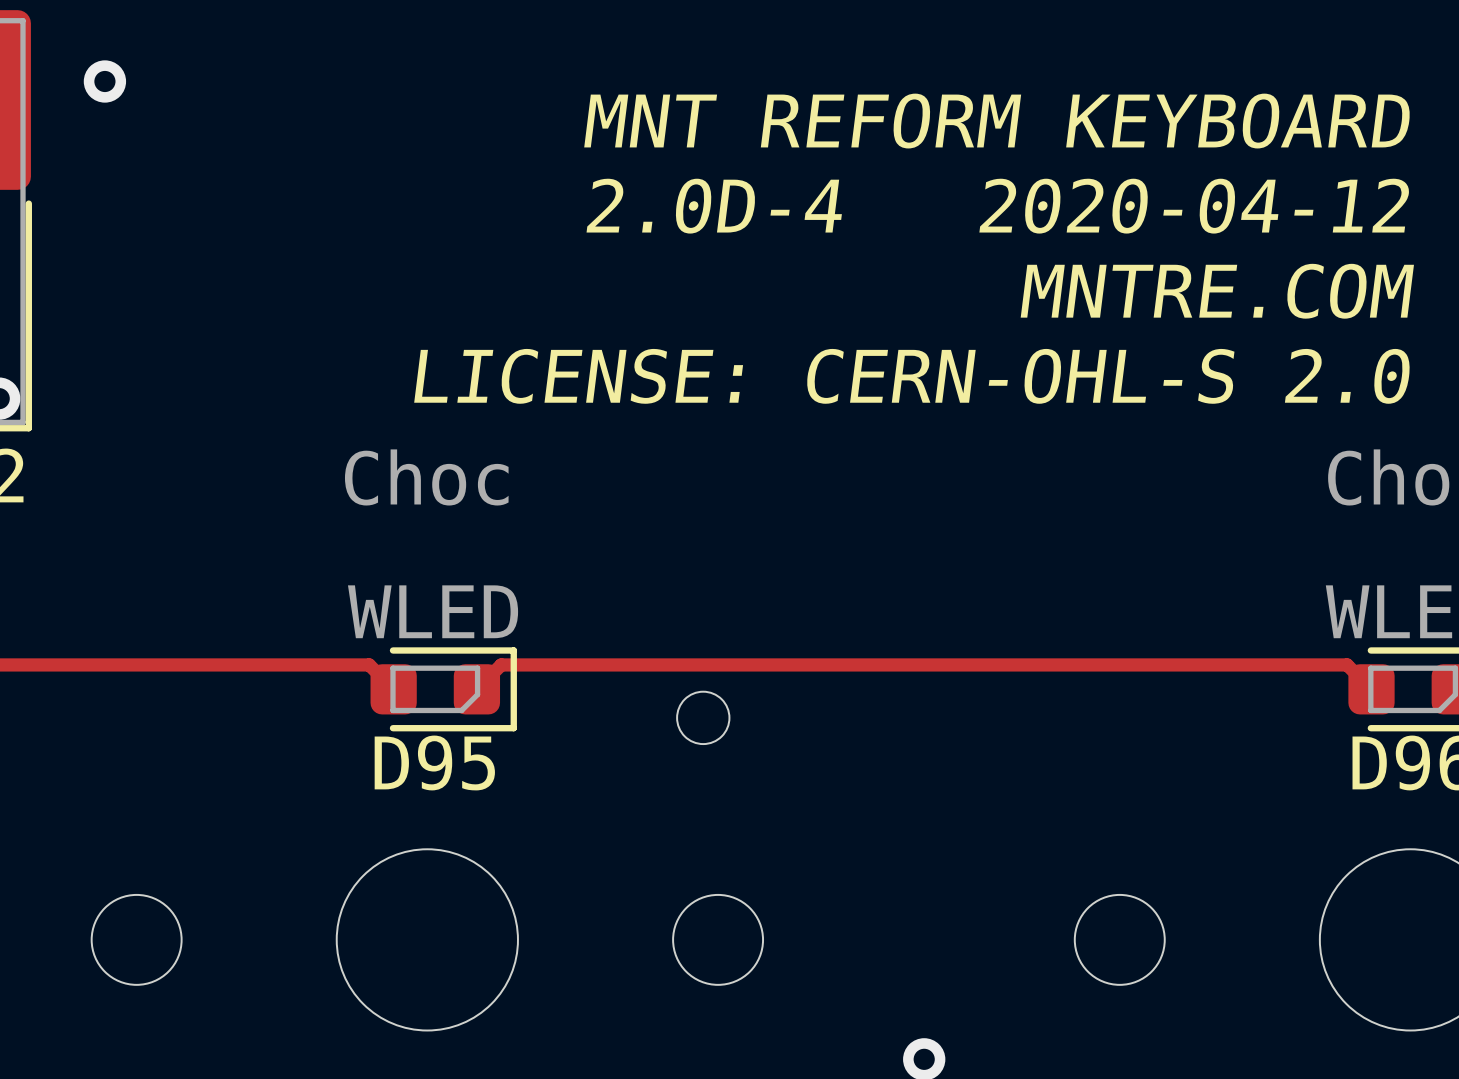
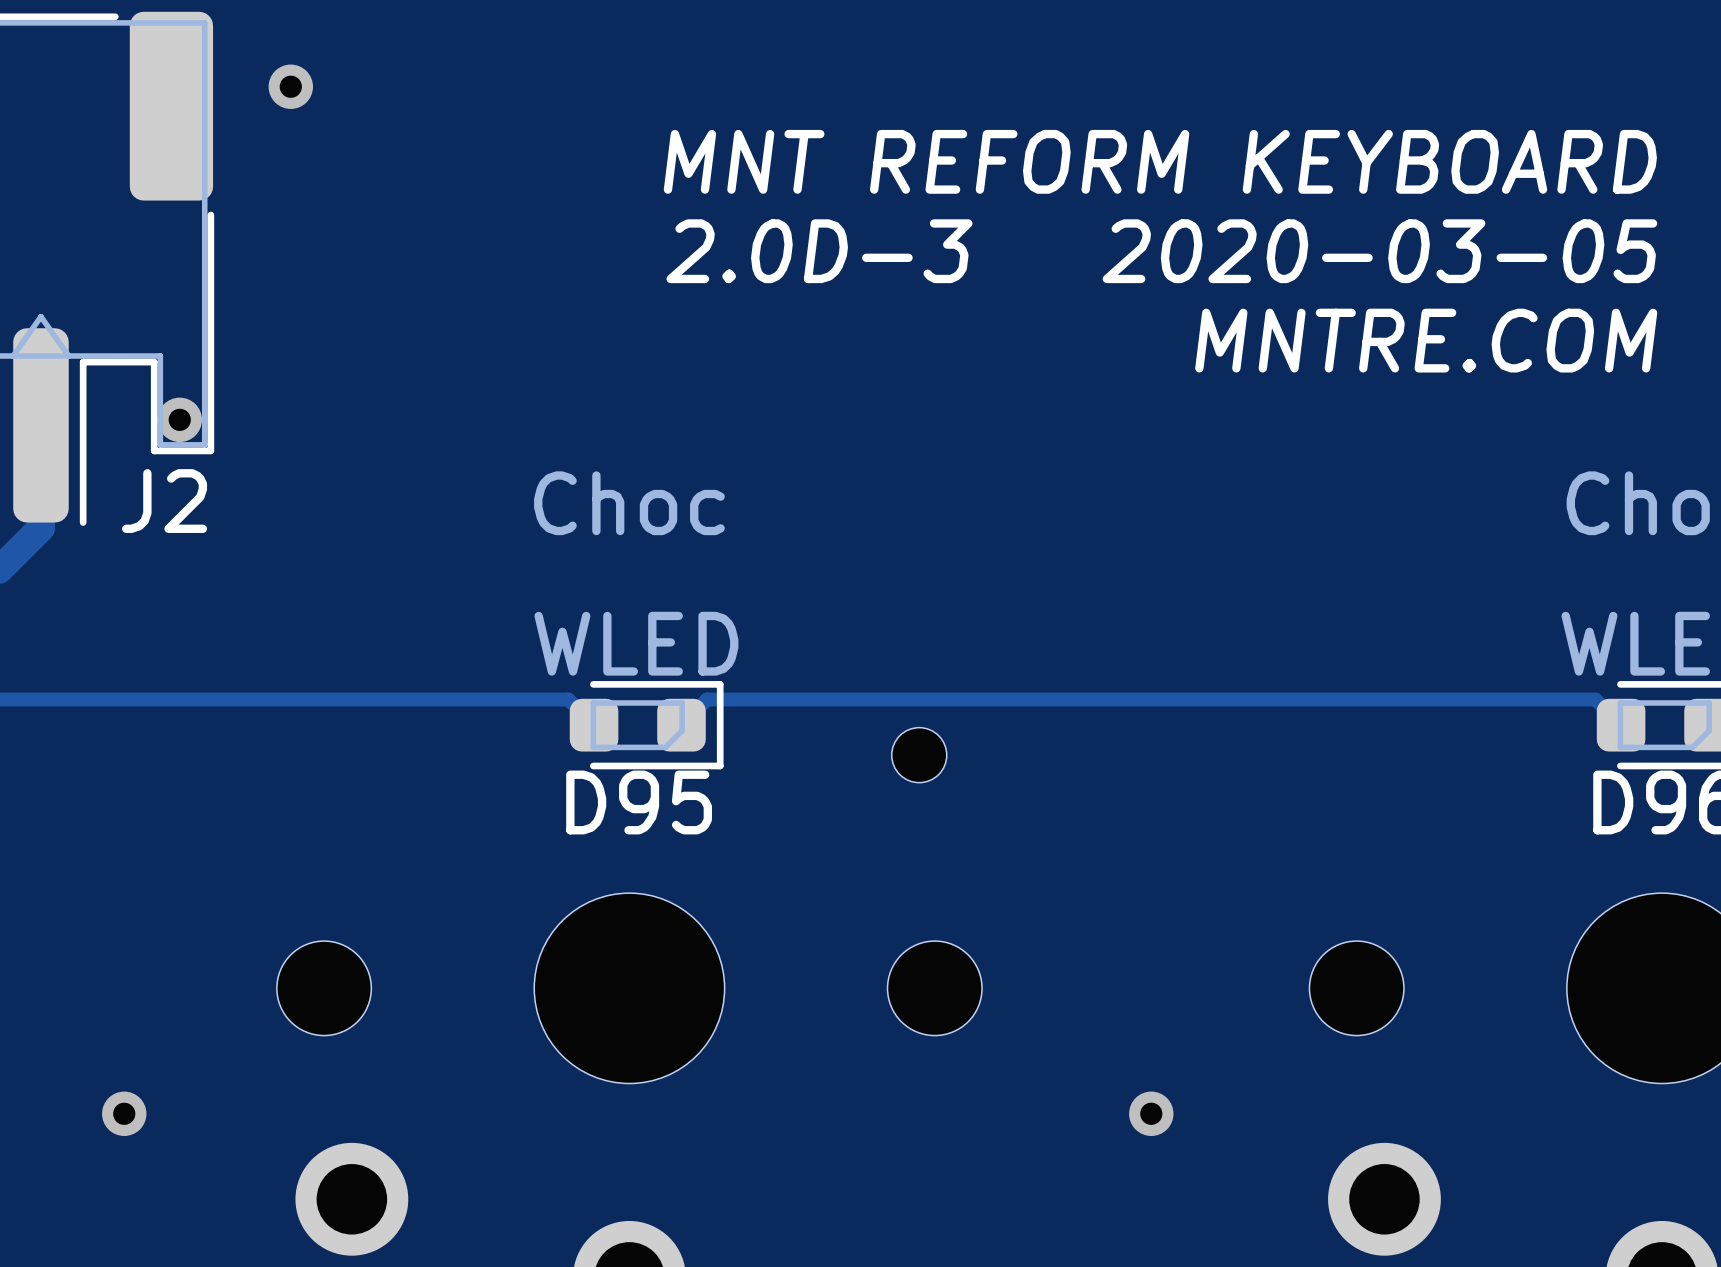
text position: MNT REFORM KEYBOARD (997, 121) -> MNT REFORM KEYBOARD (1160, 161)
text: 2.0D-4 2020-04-12 (998, 206) -> 2.0D-3 2020-03-05 (1161, 251)
text position: MNTRE.COM (1217, 291) -> MNTRE.COM (1426, 340)
text: LICENSE: CERN-OHL-S 2.0 (912, 376) -> none

